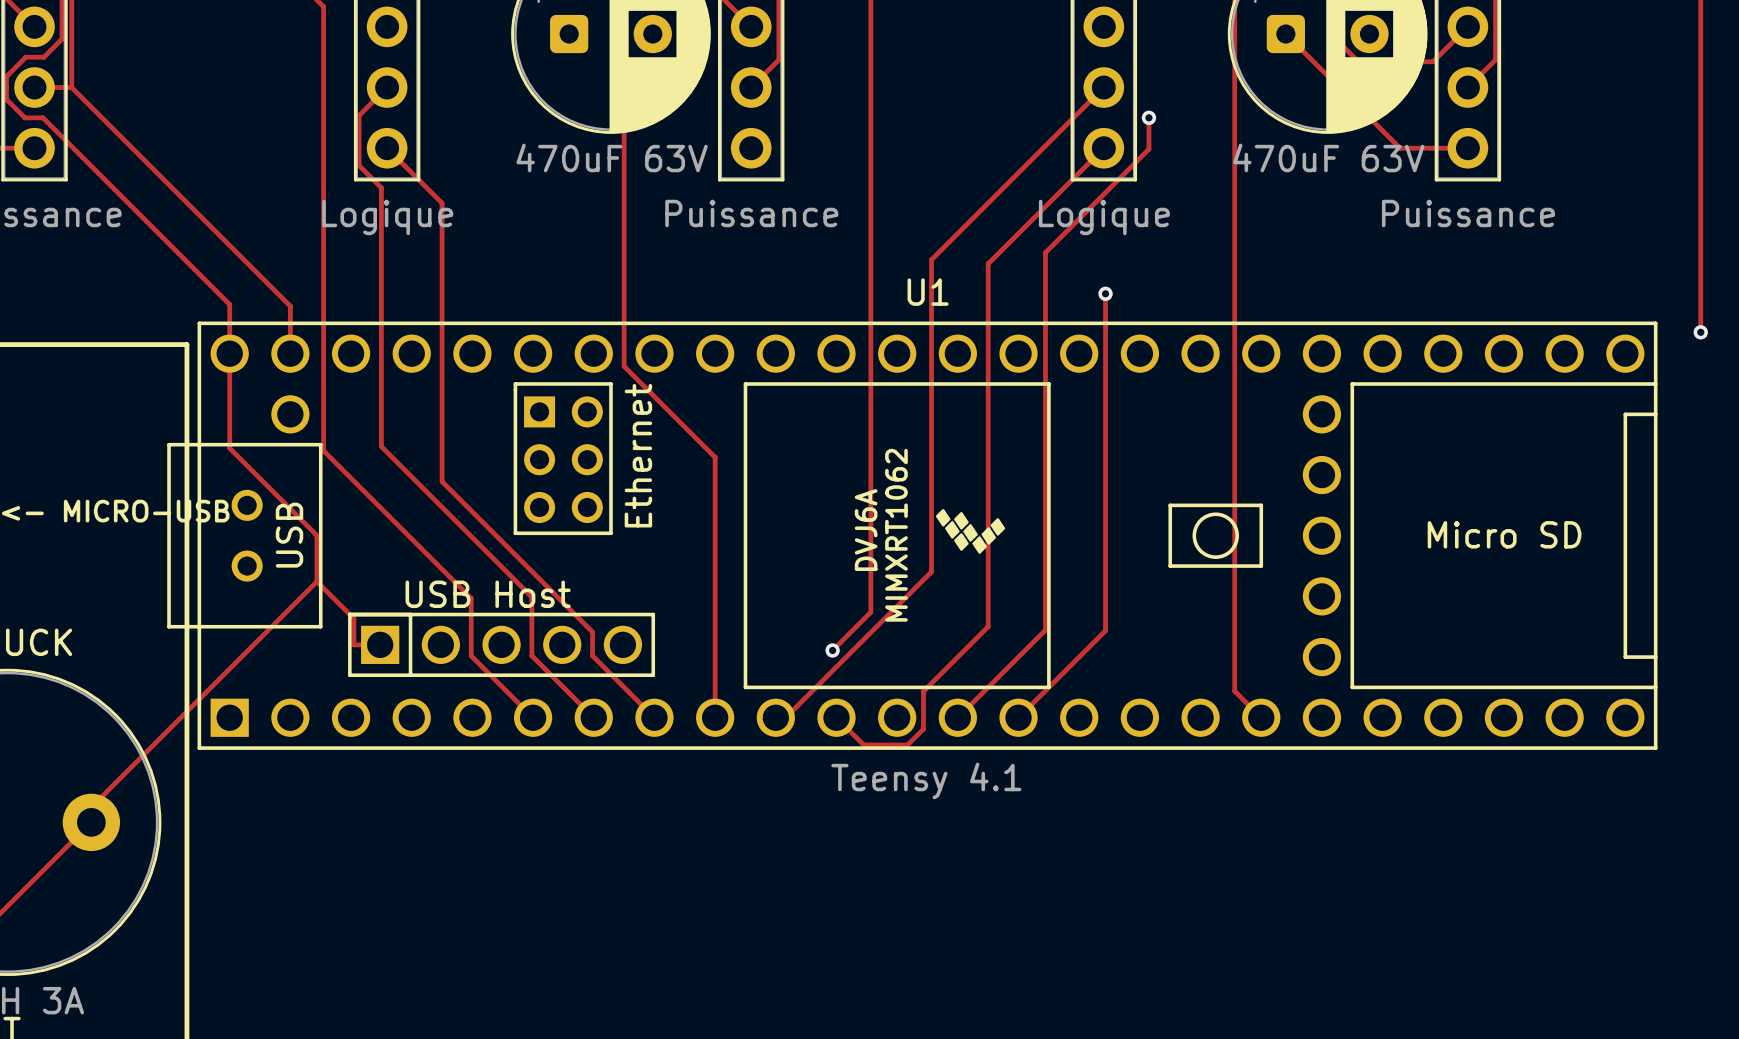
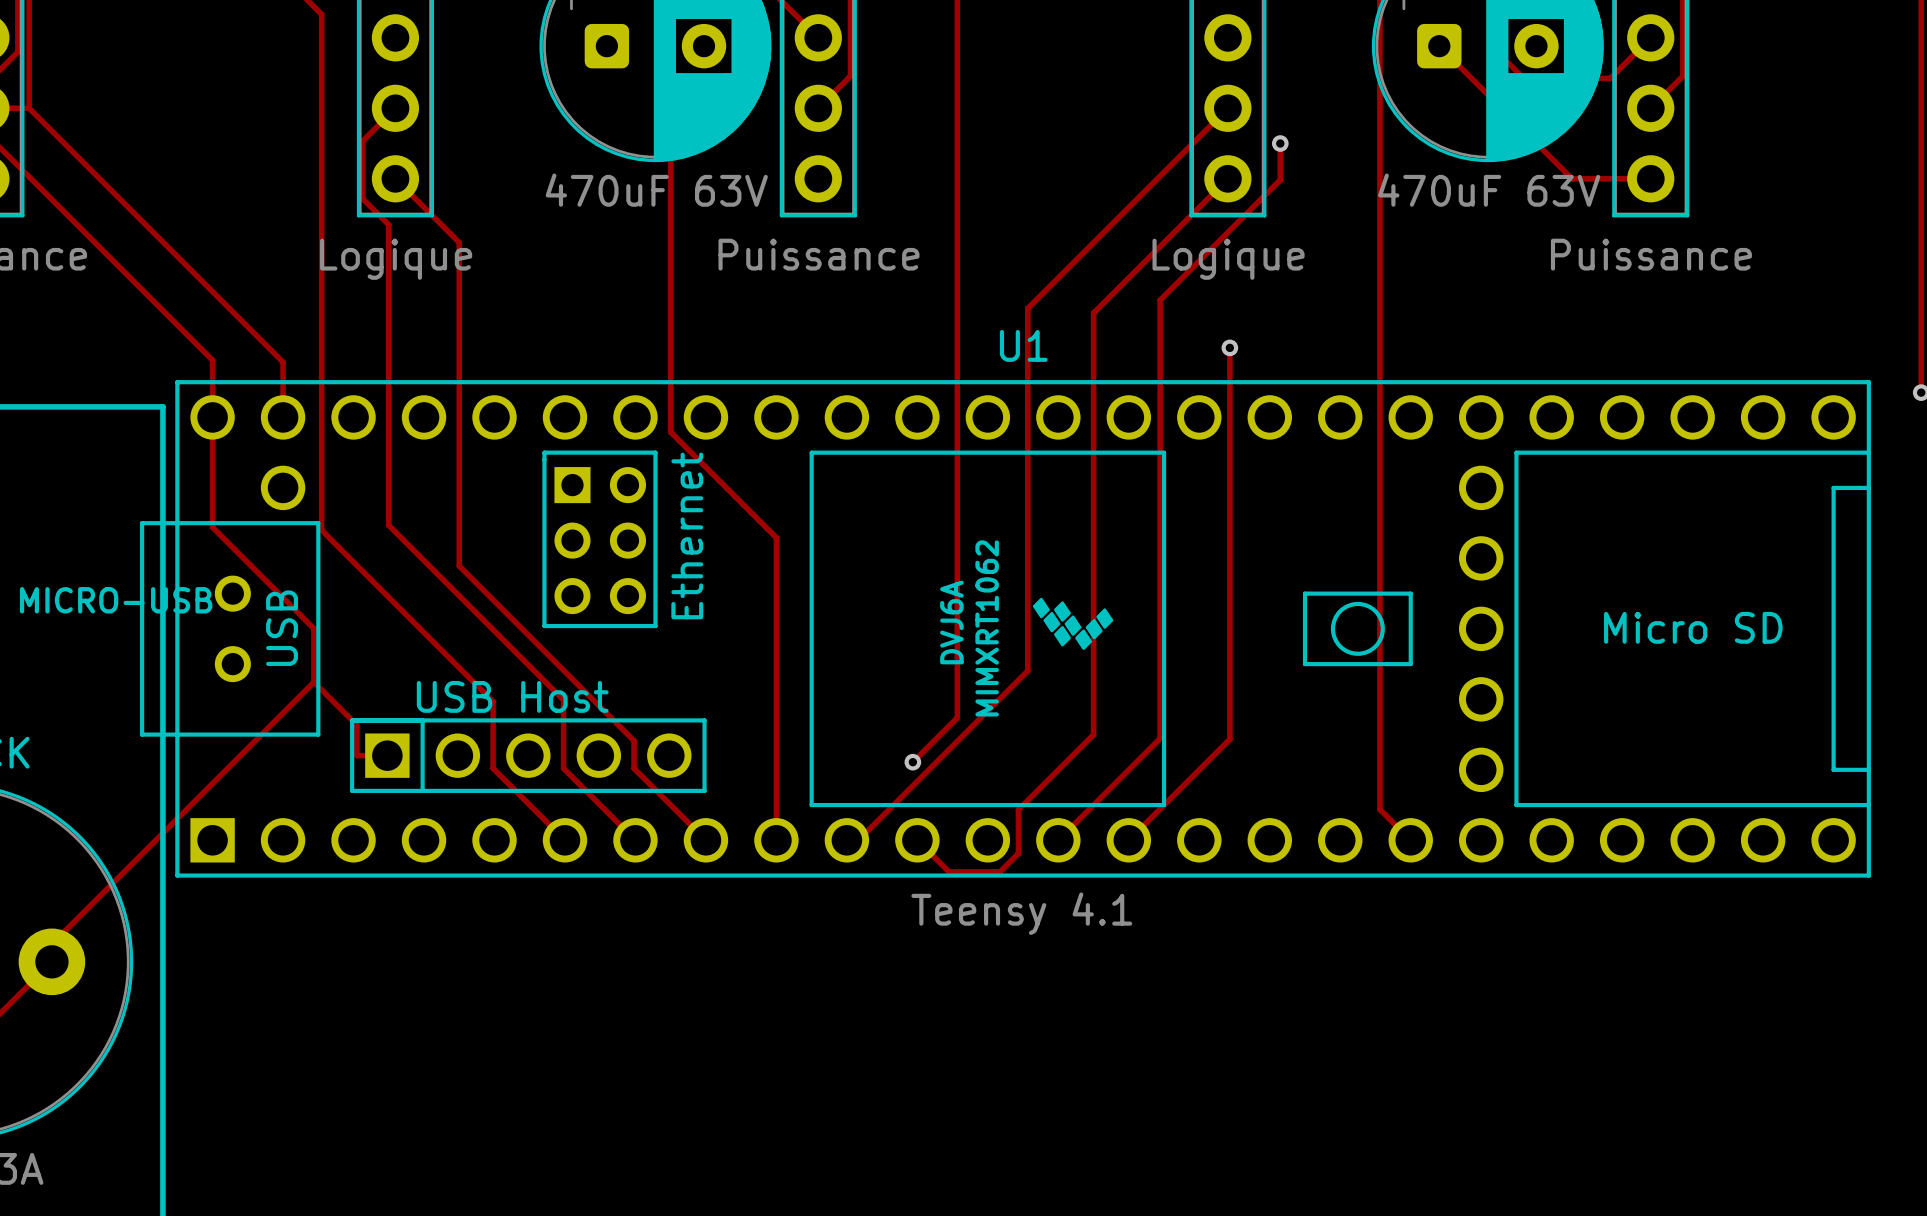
U1 footprint: [167, 321, 1658, 750] -> [140, 380, 1871, 878]

